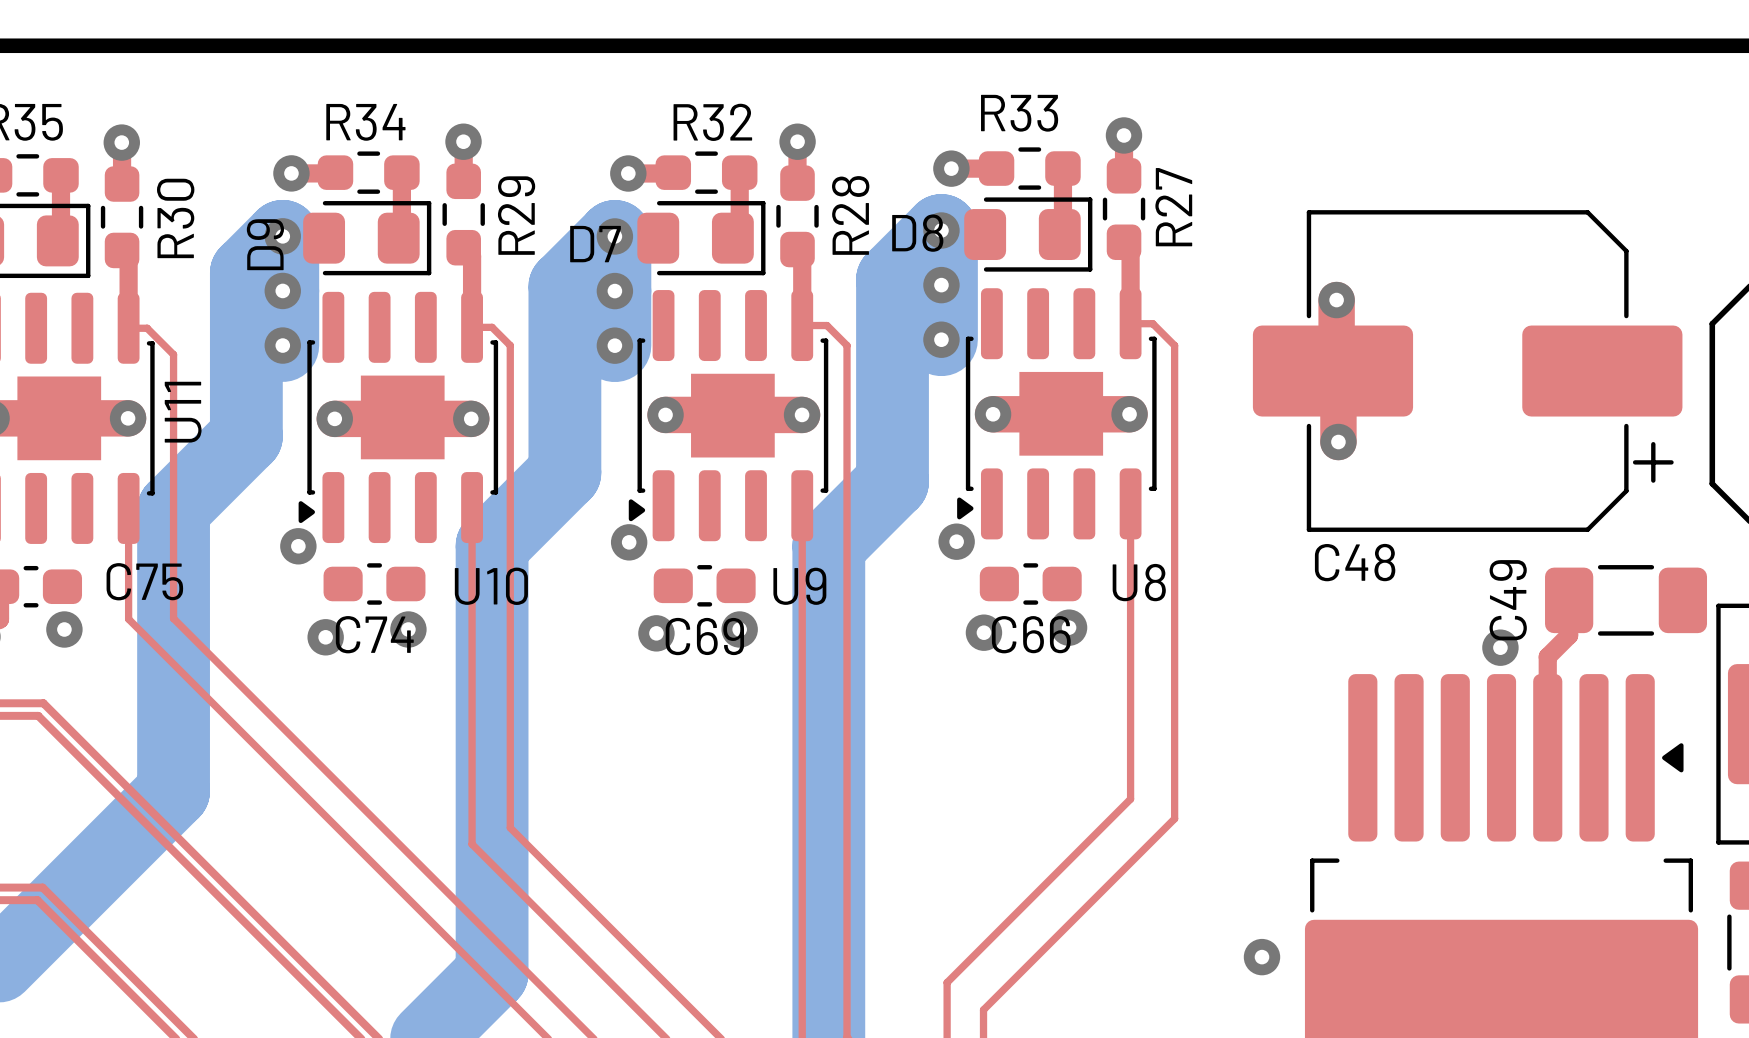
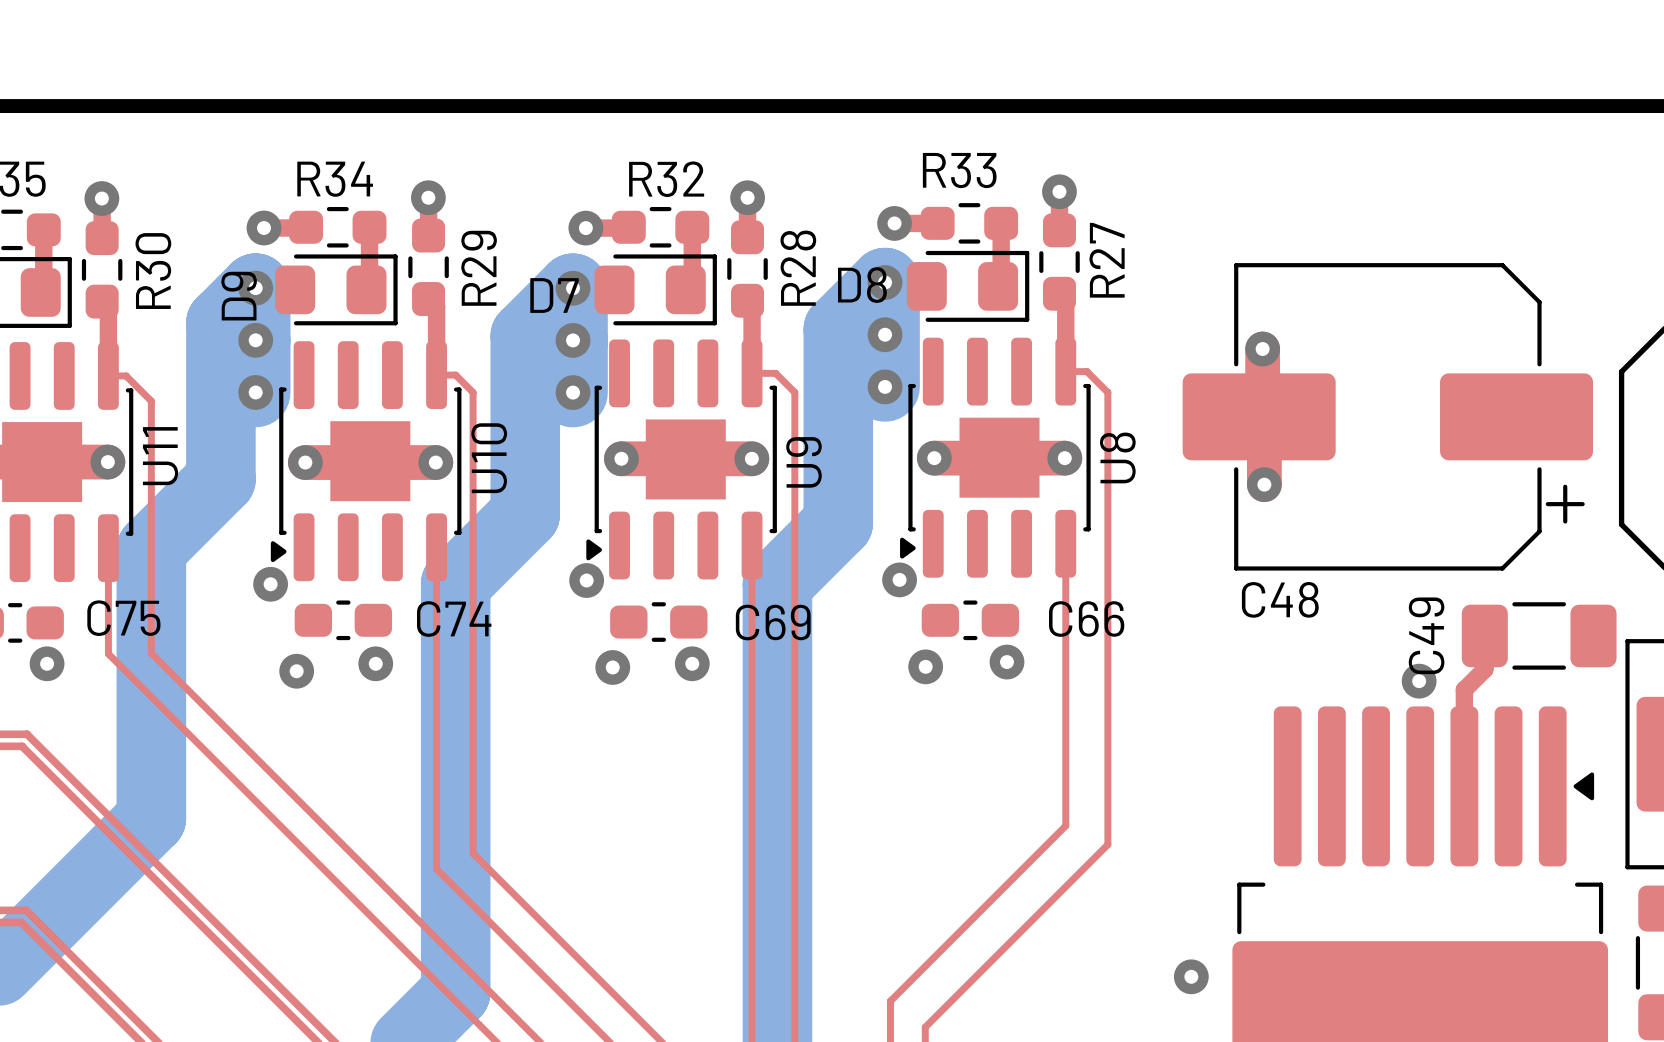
U8 name rotation: 0° (1139, 582) -> 90° counterclockwise (1117, 457)
U8 name position: U8 (1139, 582) -> U8 (1117, 457)
U10 name rotation: 0° (491, 586) -> 90° counterclockwise (489, 458)
U10 name position: U10 (491, 586) -> U10 (489, 458)
U9 name rotation: 0° (799, 586) -> 90° counterclockwise (803, 462)
U9 name position: U9 (799, 586) -> U9 (803, 462)
C74 name position: C74 (374, 634) -> C74 (454, 619)
C66 name position: C66 (1031, 634) -> C66 (1086, 619)
C69 name position: C69 (704, 636) -> C69 (773, 622)

